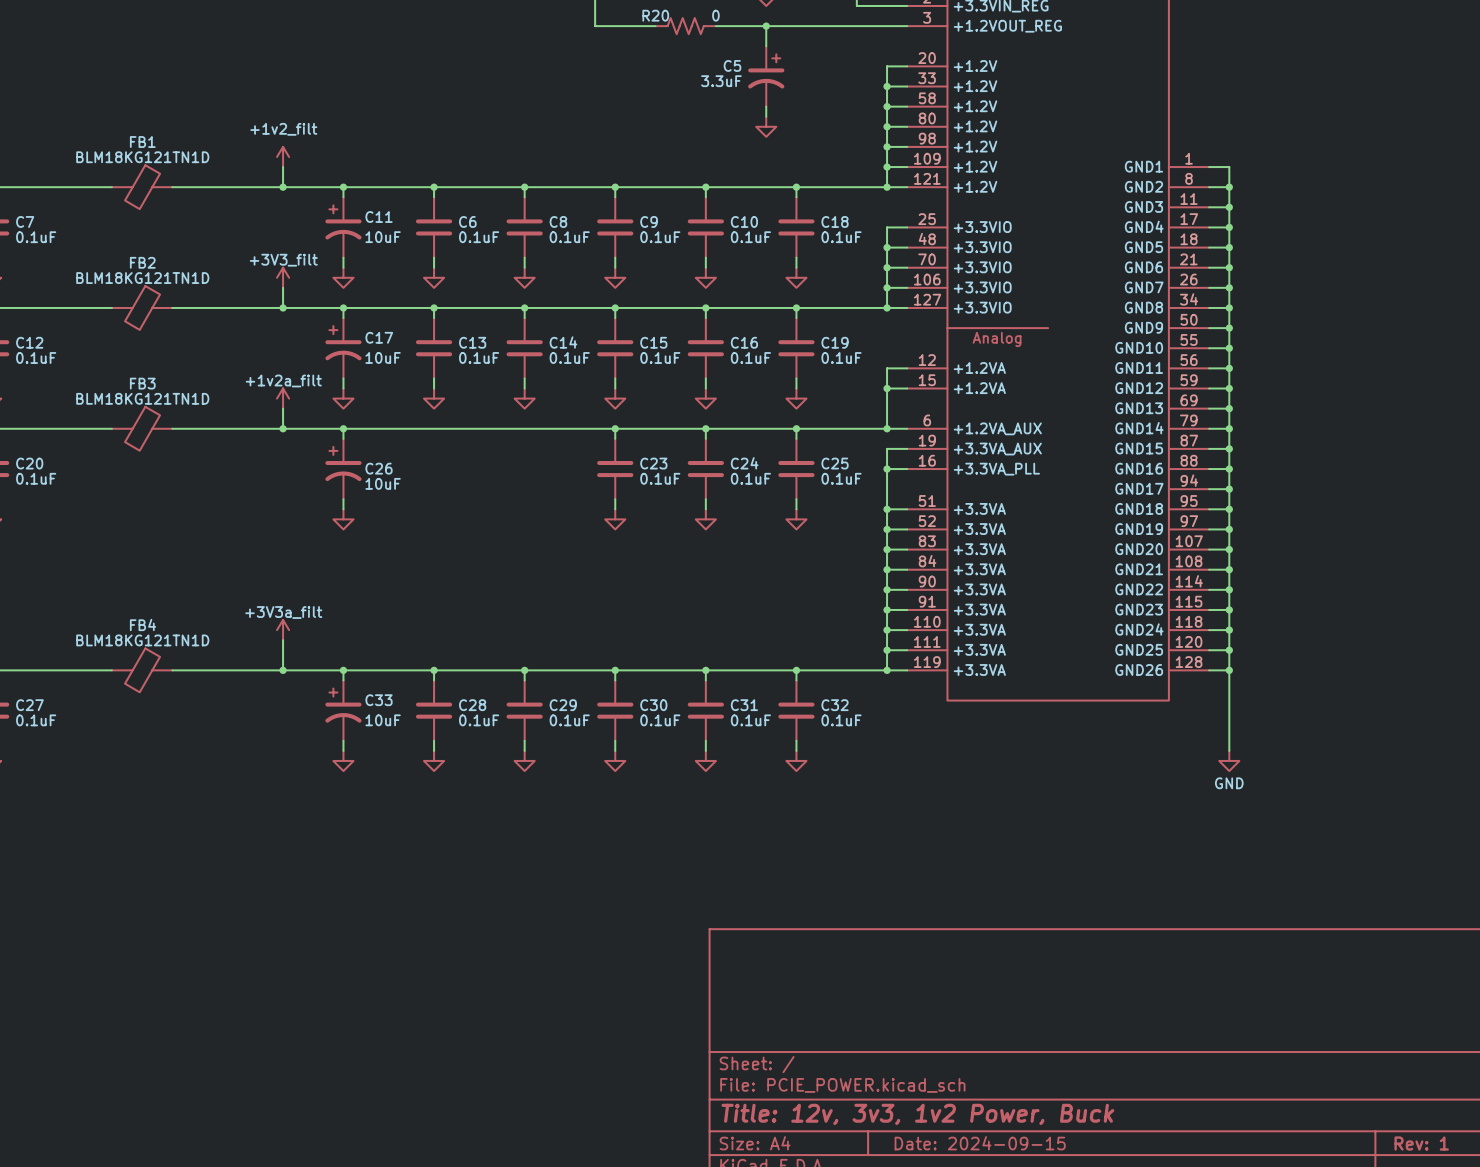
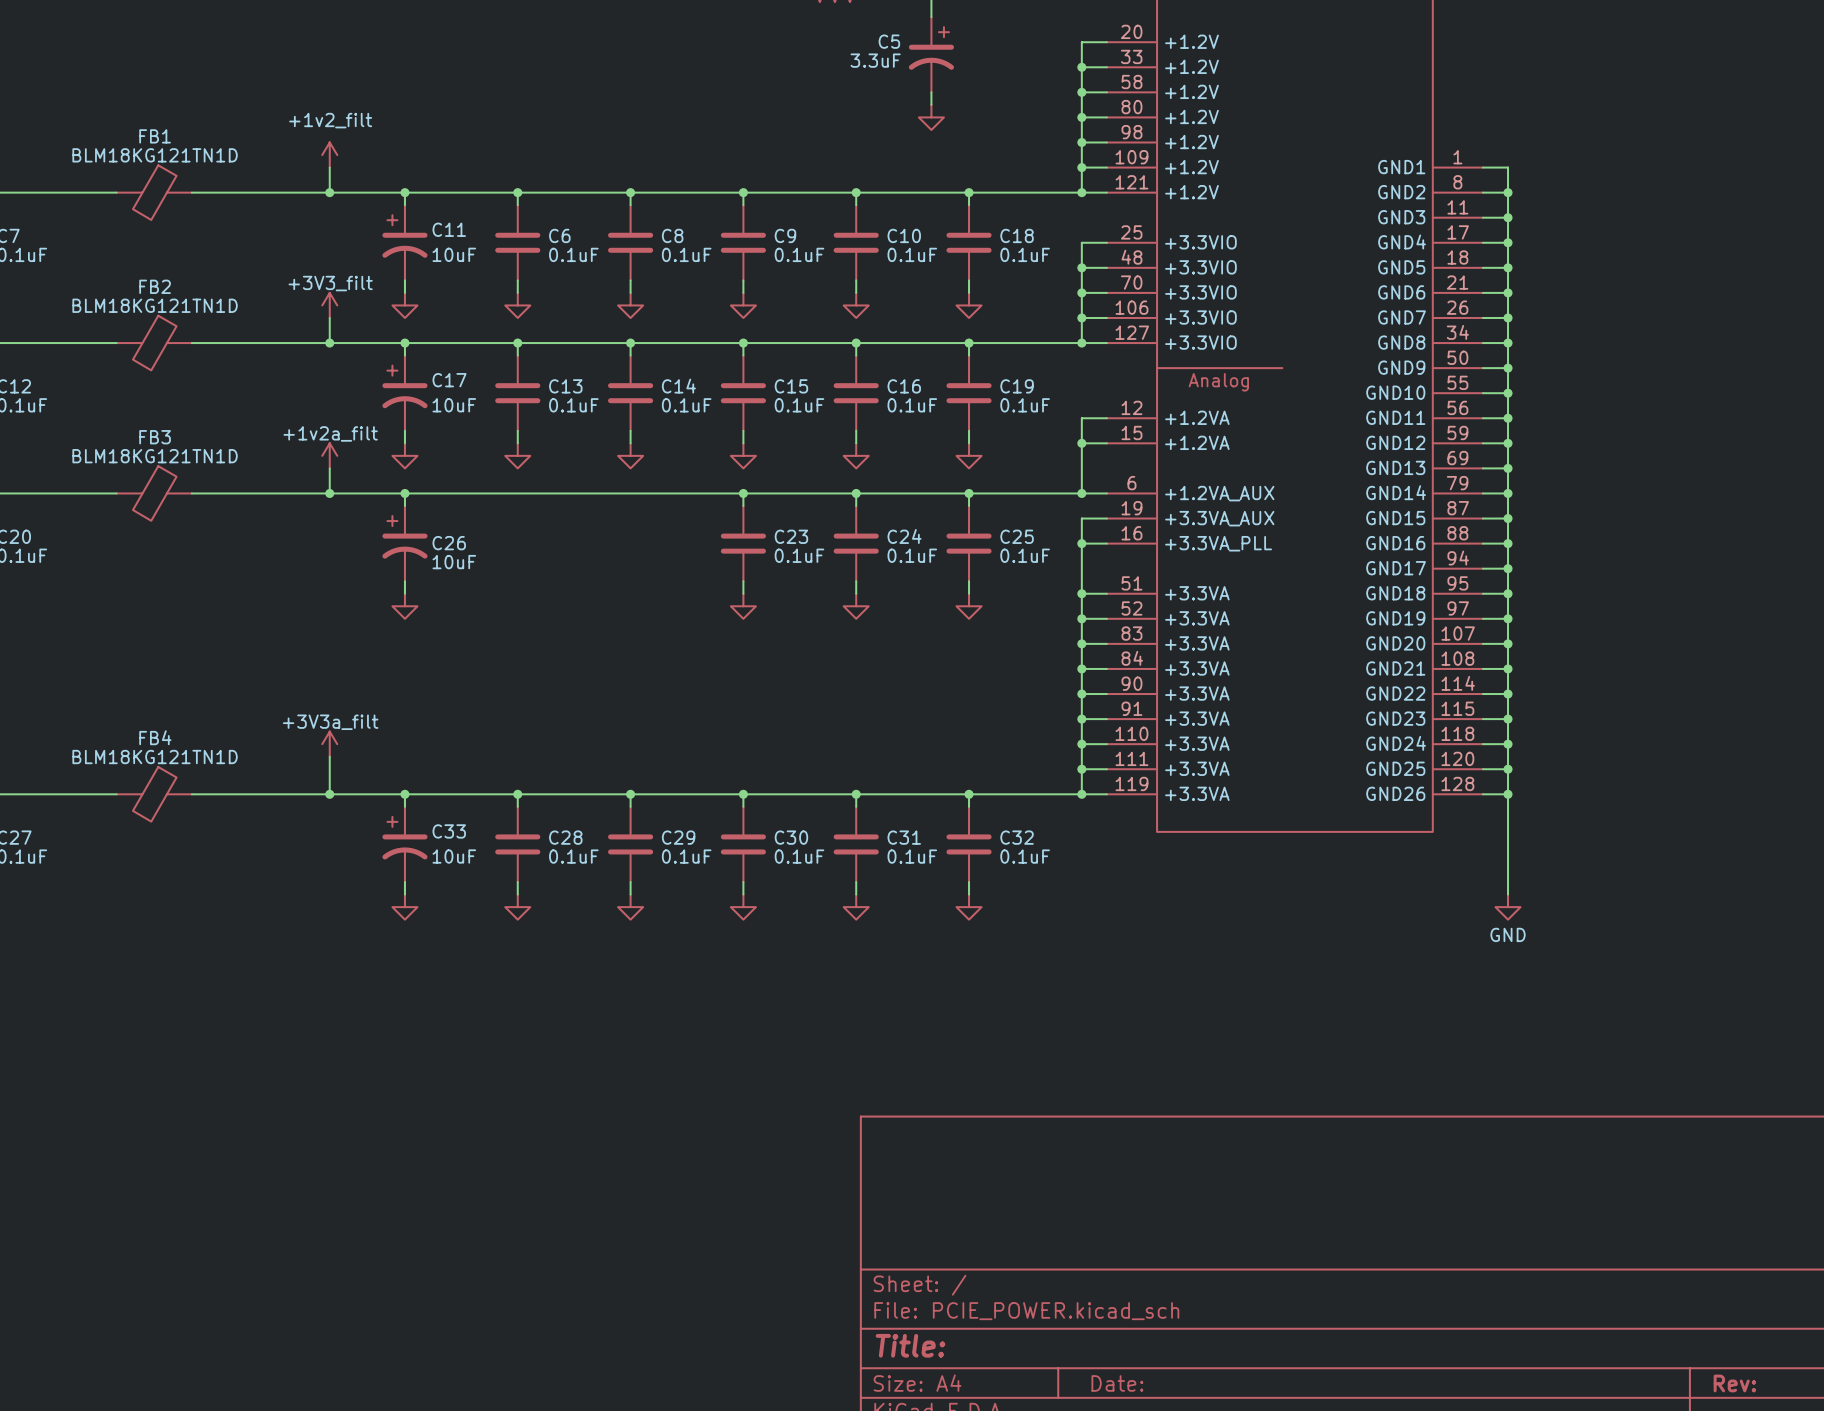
title block: Title: 12v, 3v3, 1v2 Power, Buck (917, 1114) -> Title: (910, 1345)
title block: Date: 2024-09-15 (980, 1143) -> Date: (1117, 1383)
title block: Rev: 1 (1421, 1143) -> Rev: (1734, 1383)

